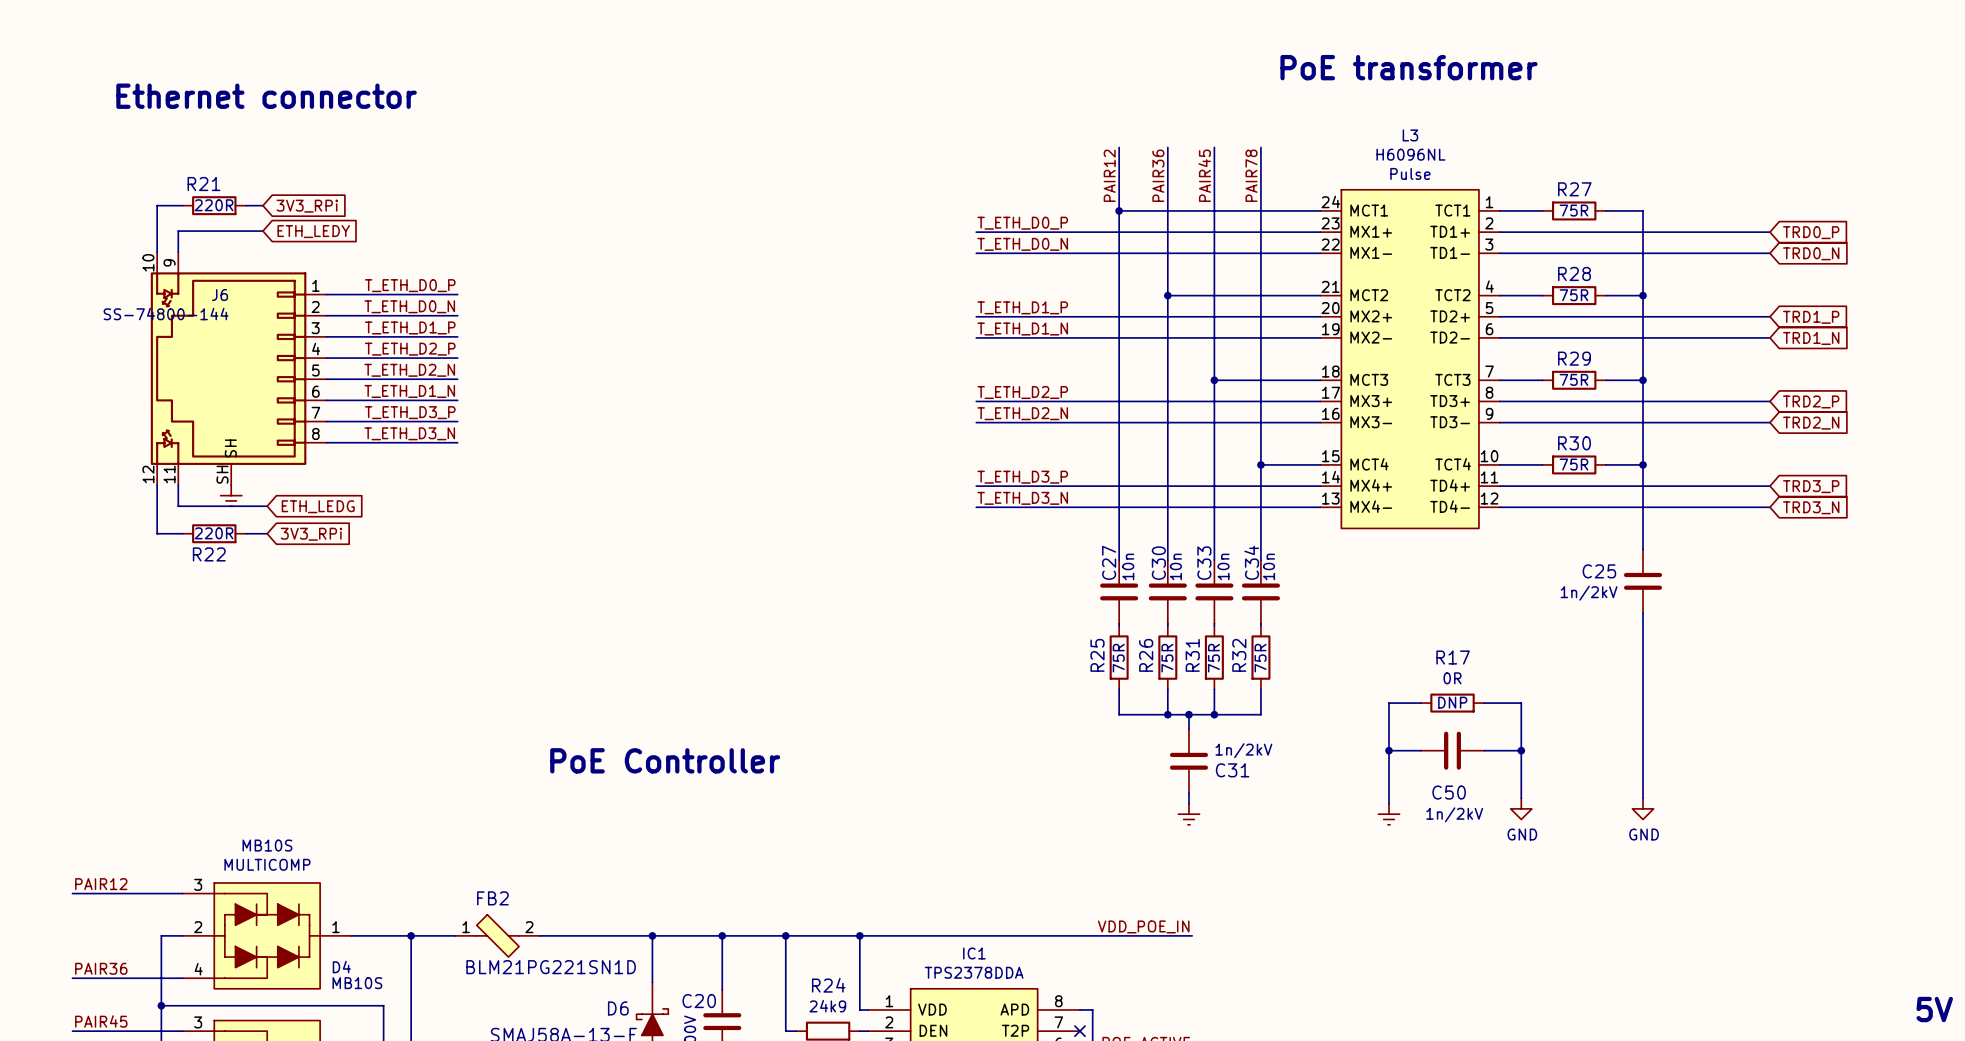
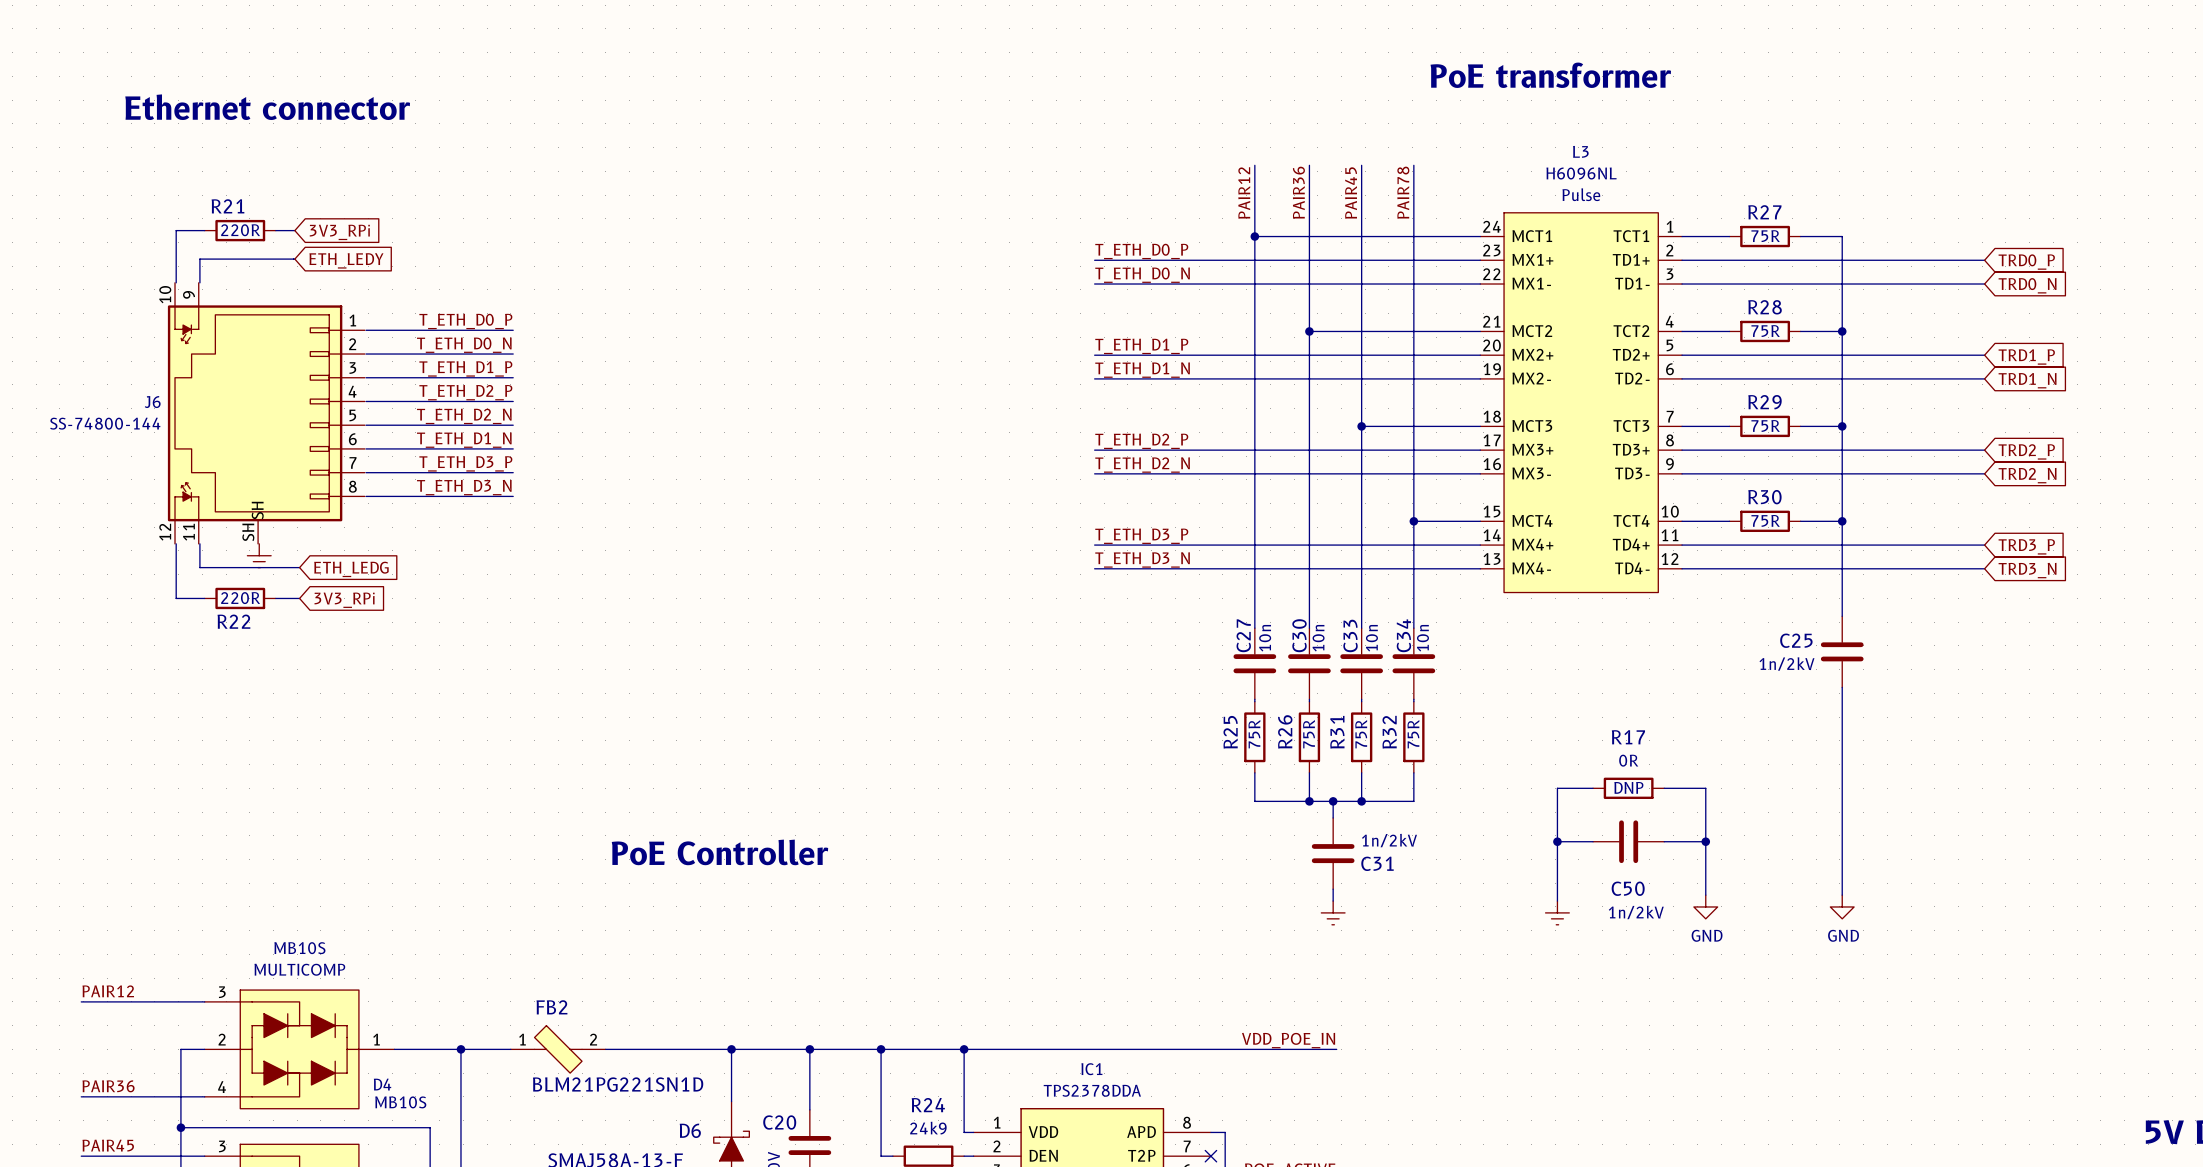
J6 symbol: [150, 252, 327, 486] -> [167, 282, 365, 544]
J6 name position: J6 (220, 295) -> J6 (152, 402)
J6 value position: SS-74800-144 (166, 314) -> SS-74800-144 (105, 423)

